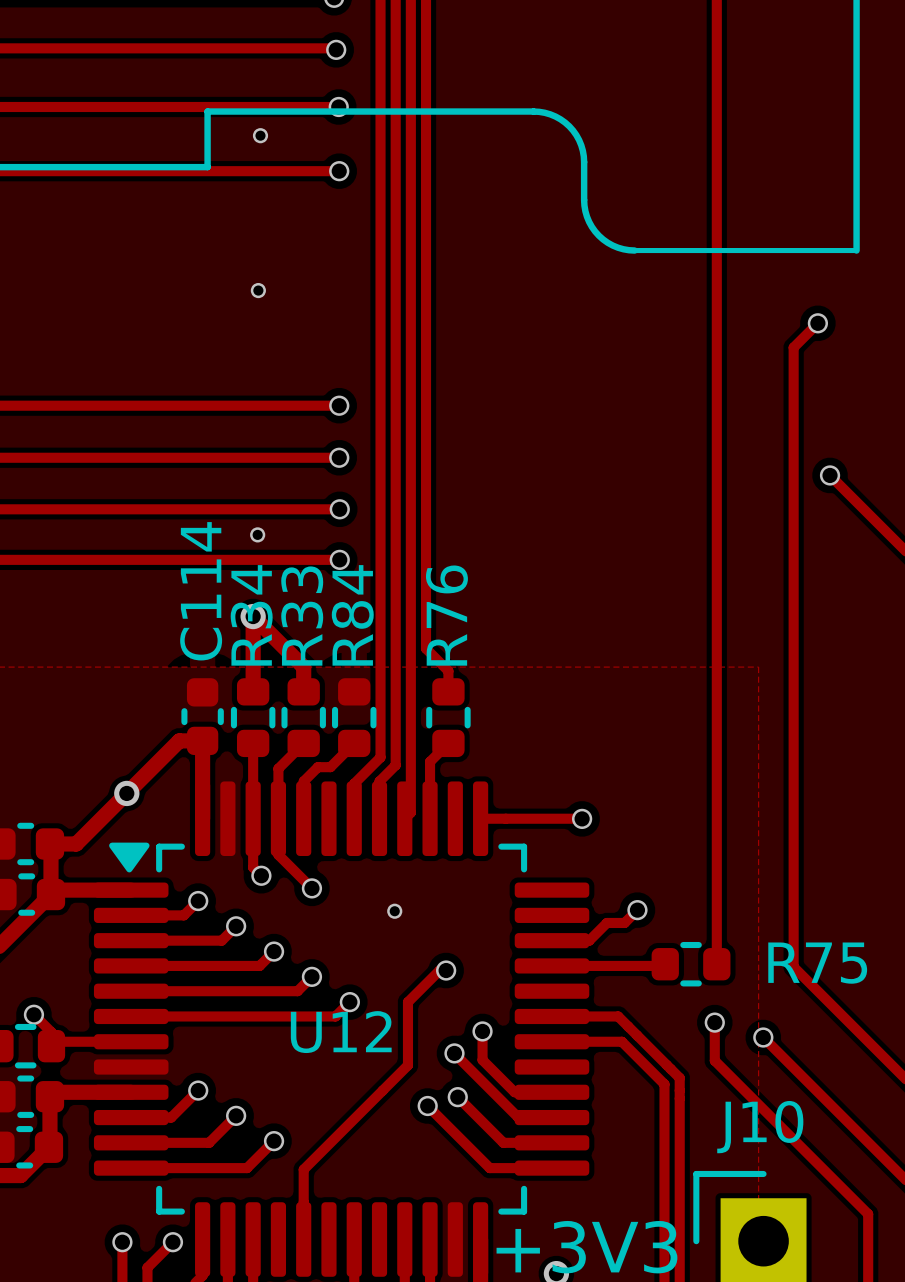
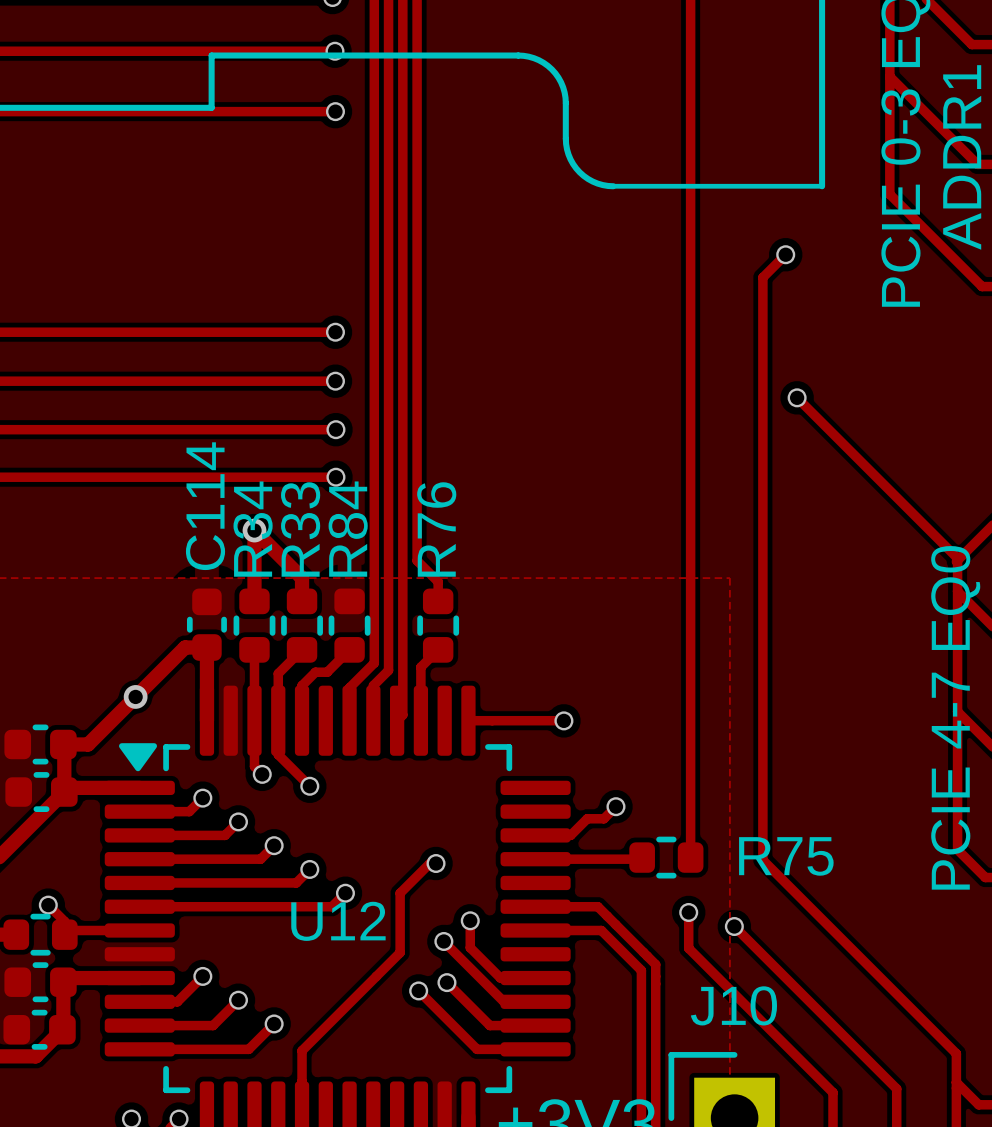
via: (260, 135) -> none
via: (258, 290) -> none
via: (257, 534) -> none
via: (394, 911) -> none

